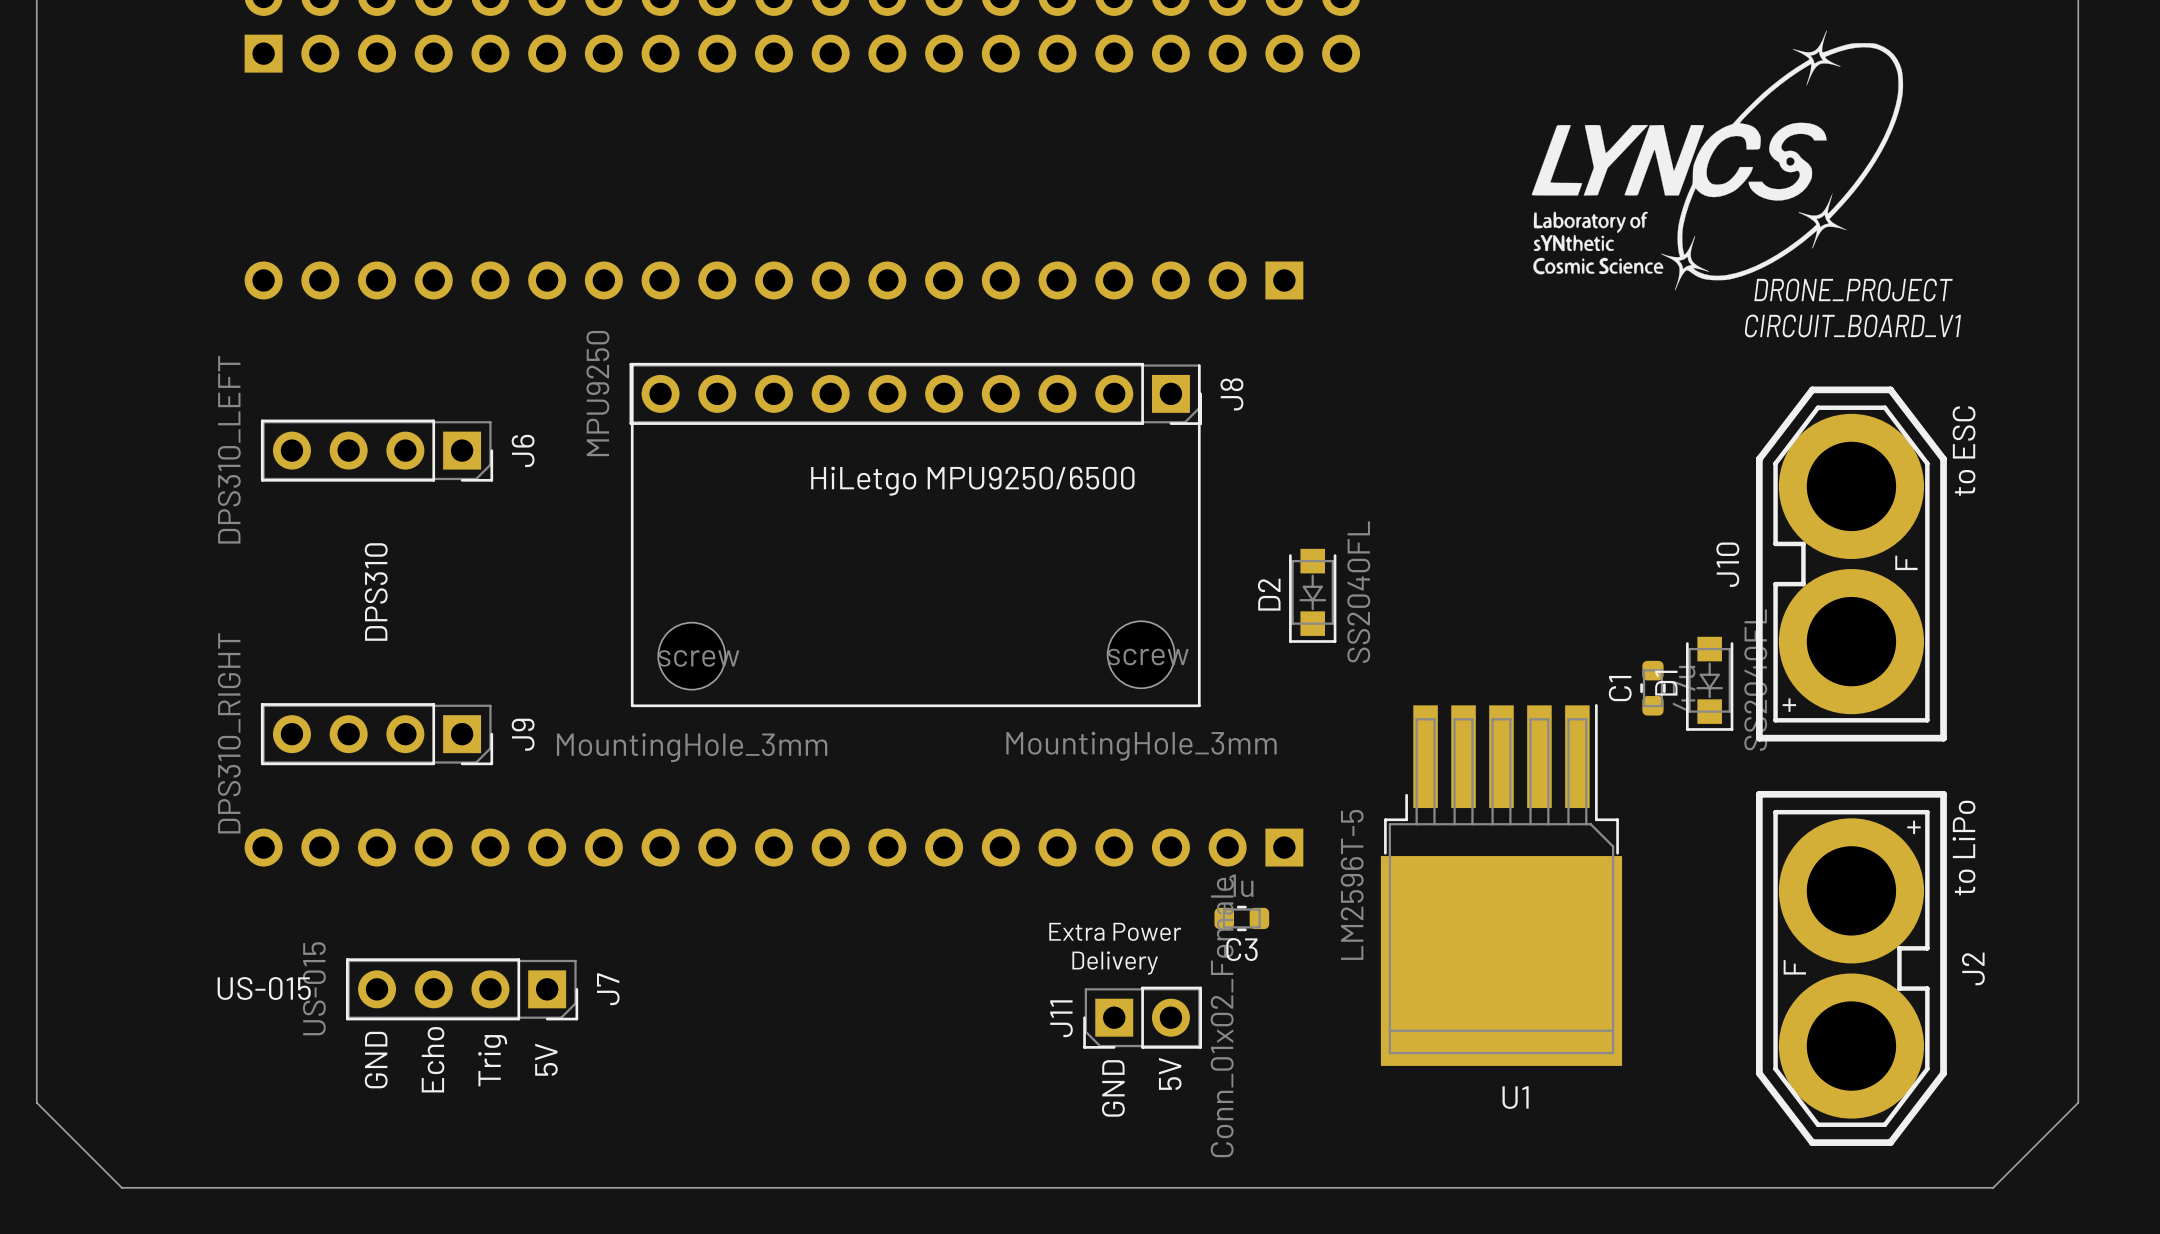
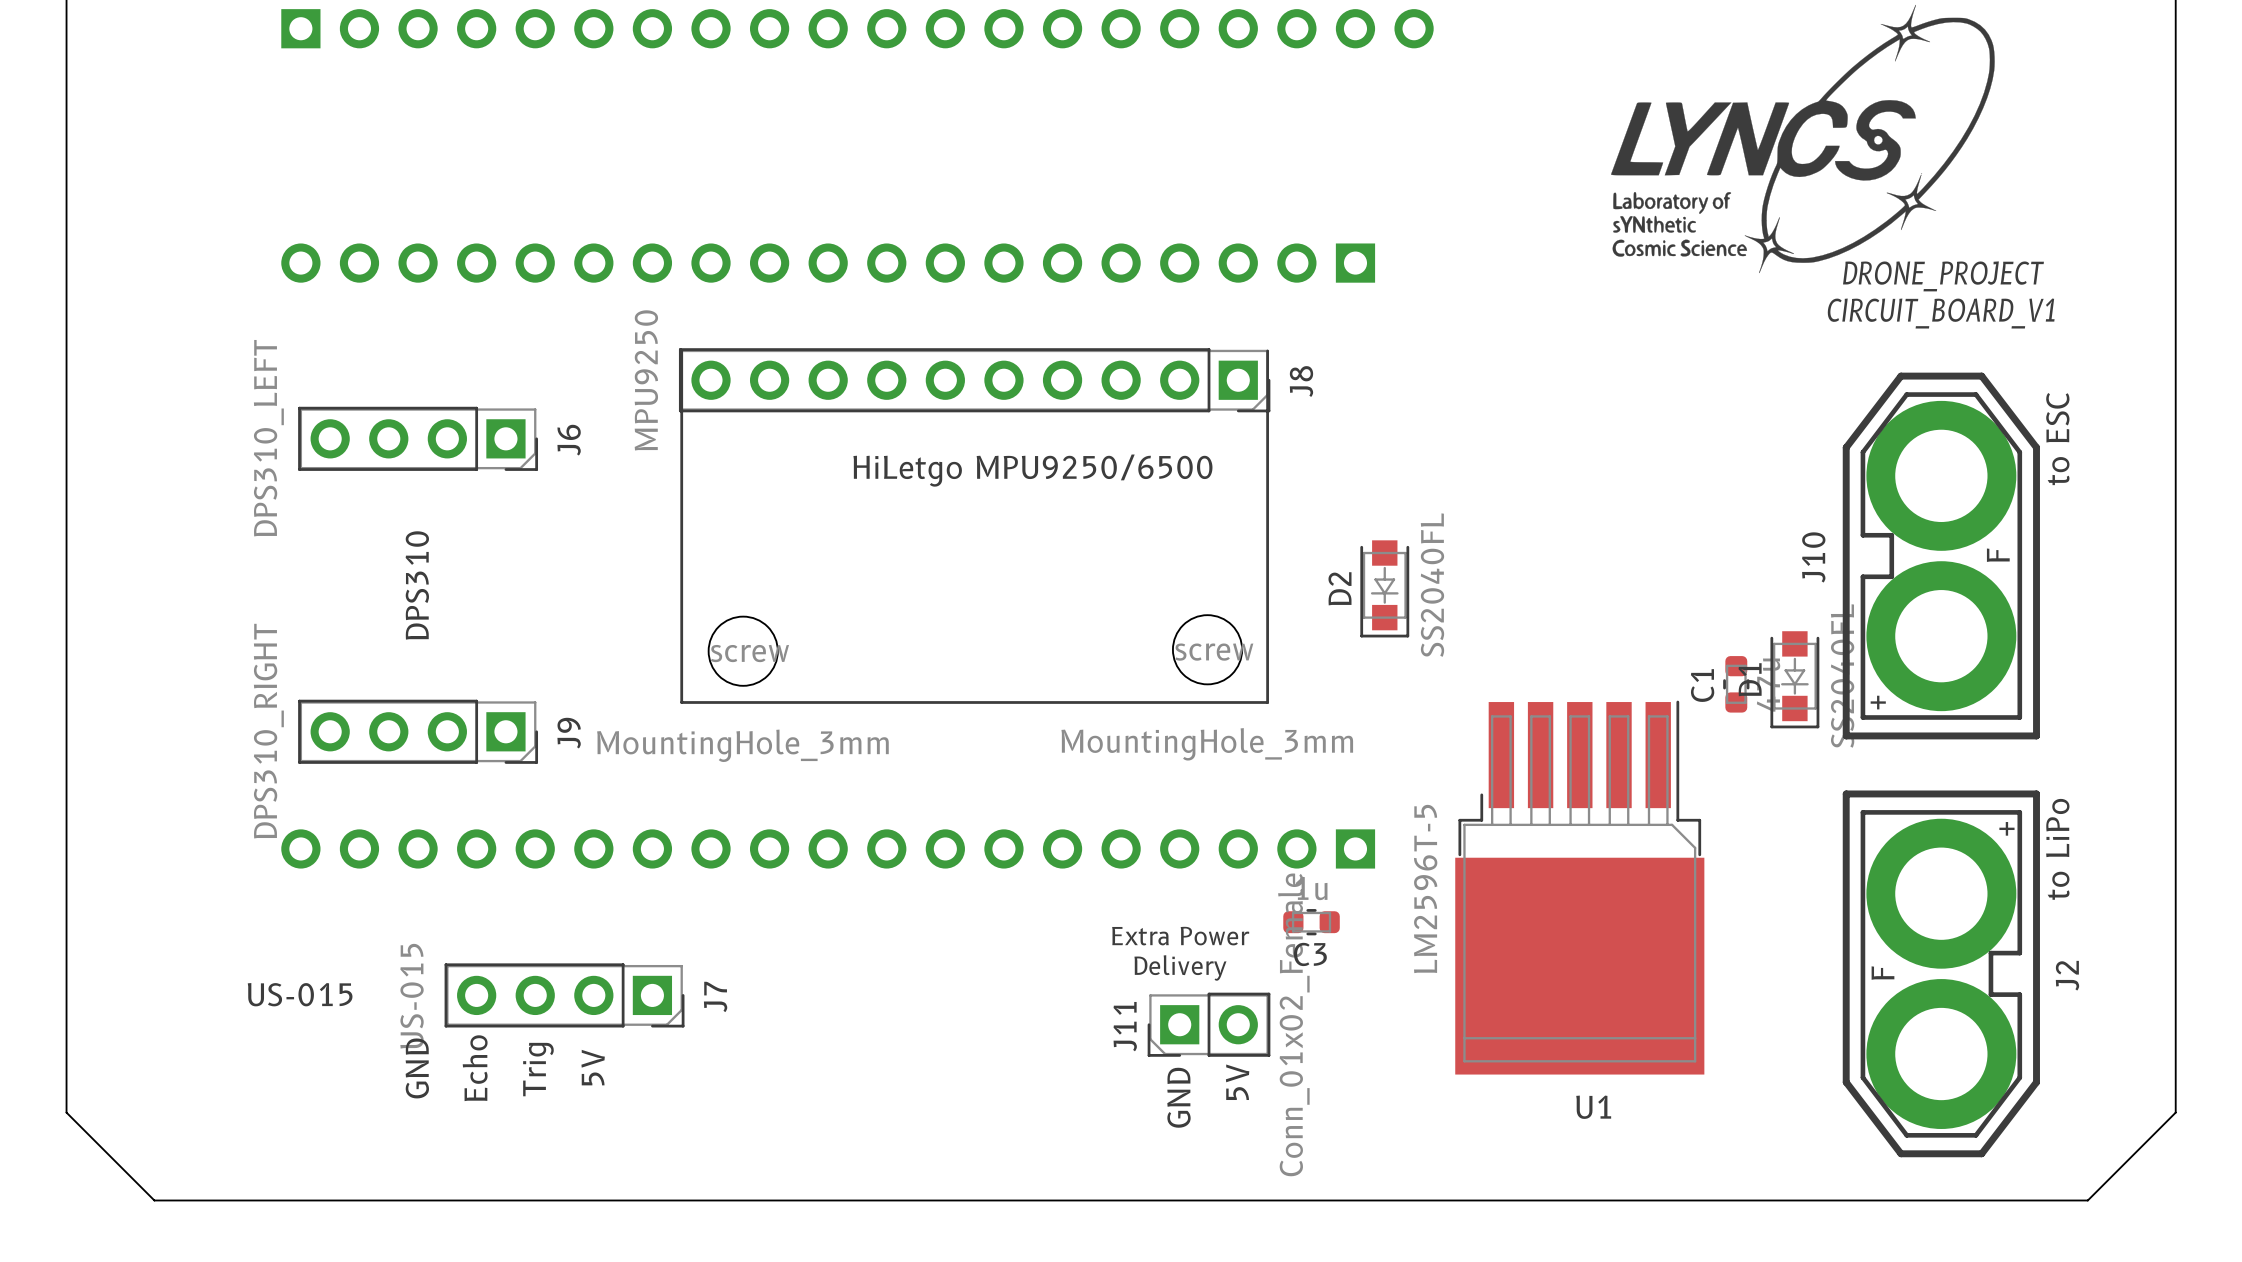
J7 position: (462, 989) -> (564, 995)

